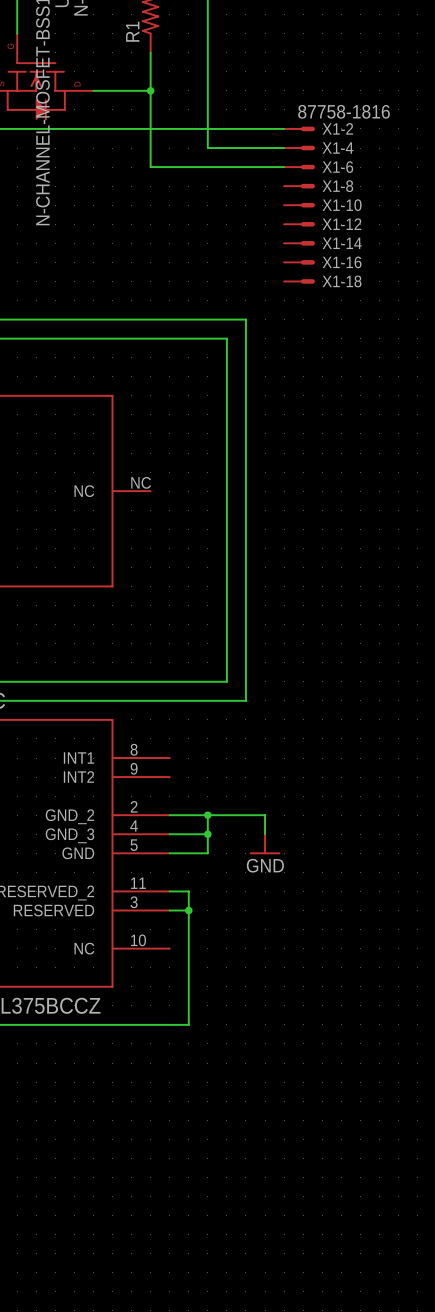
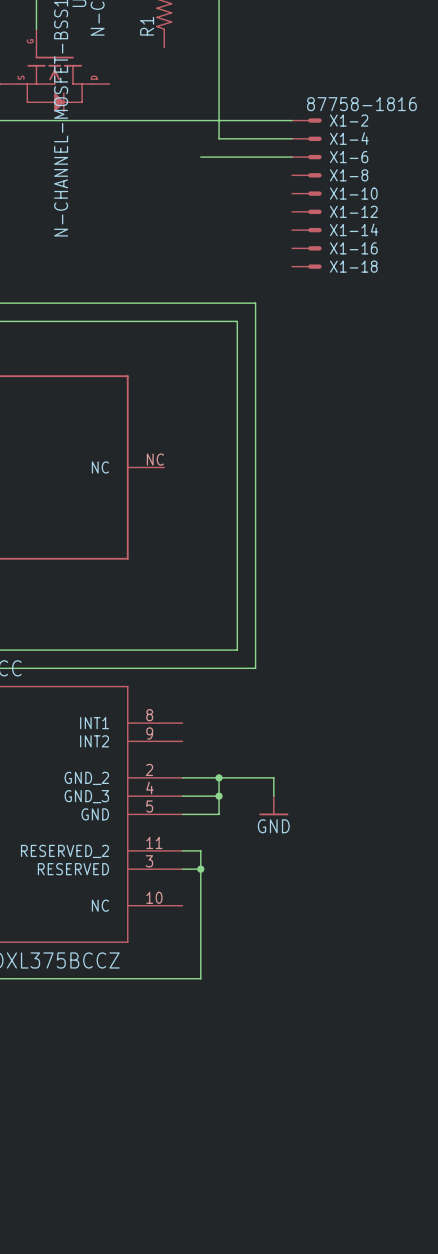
wire: (150, 52) (150, 167) (188, 167) -> none
wire: (93, 90) (150, 90) -> none
junction: (150, 90) -> none

